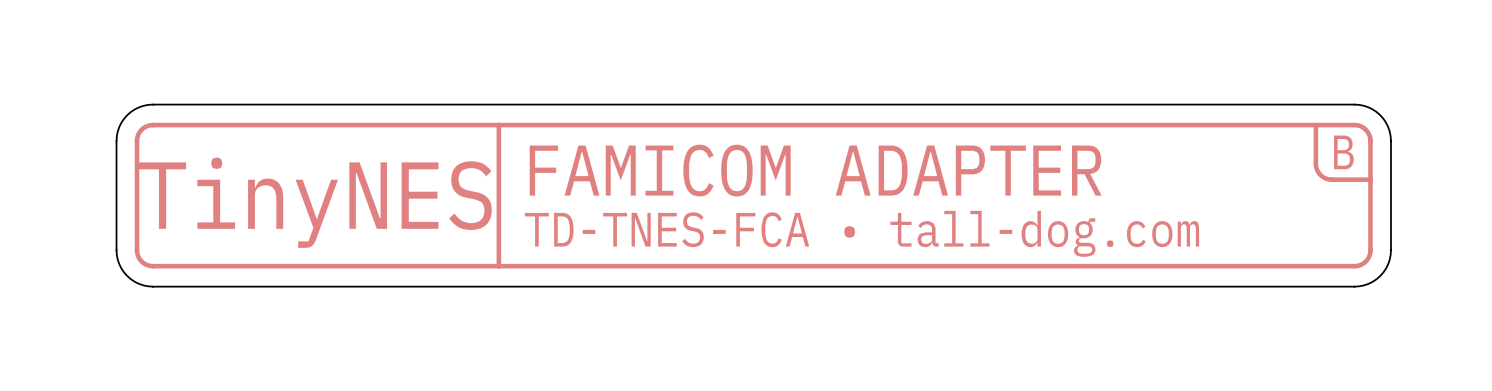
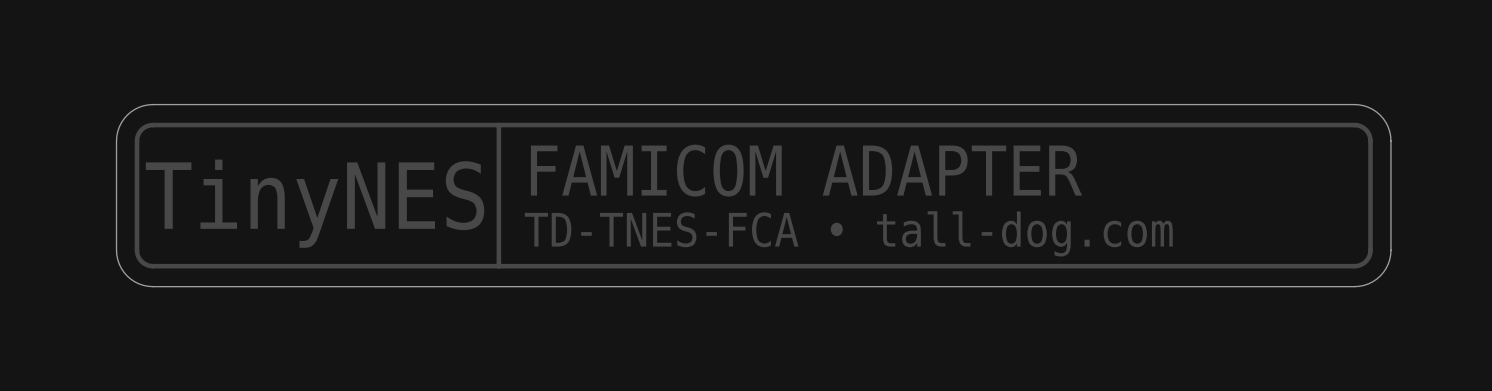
track: (1315, 125) (1316, 165) (1320, 175) (1329, 179) (1370, 179) -> none
text: B (1343, 152) -> none

